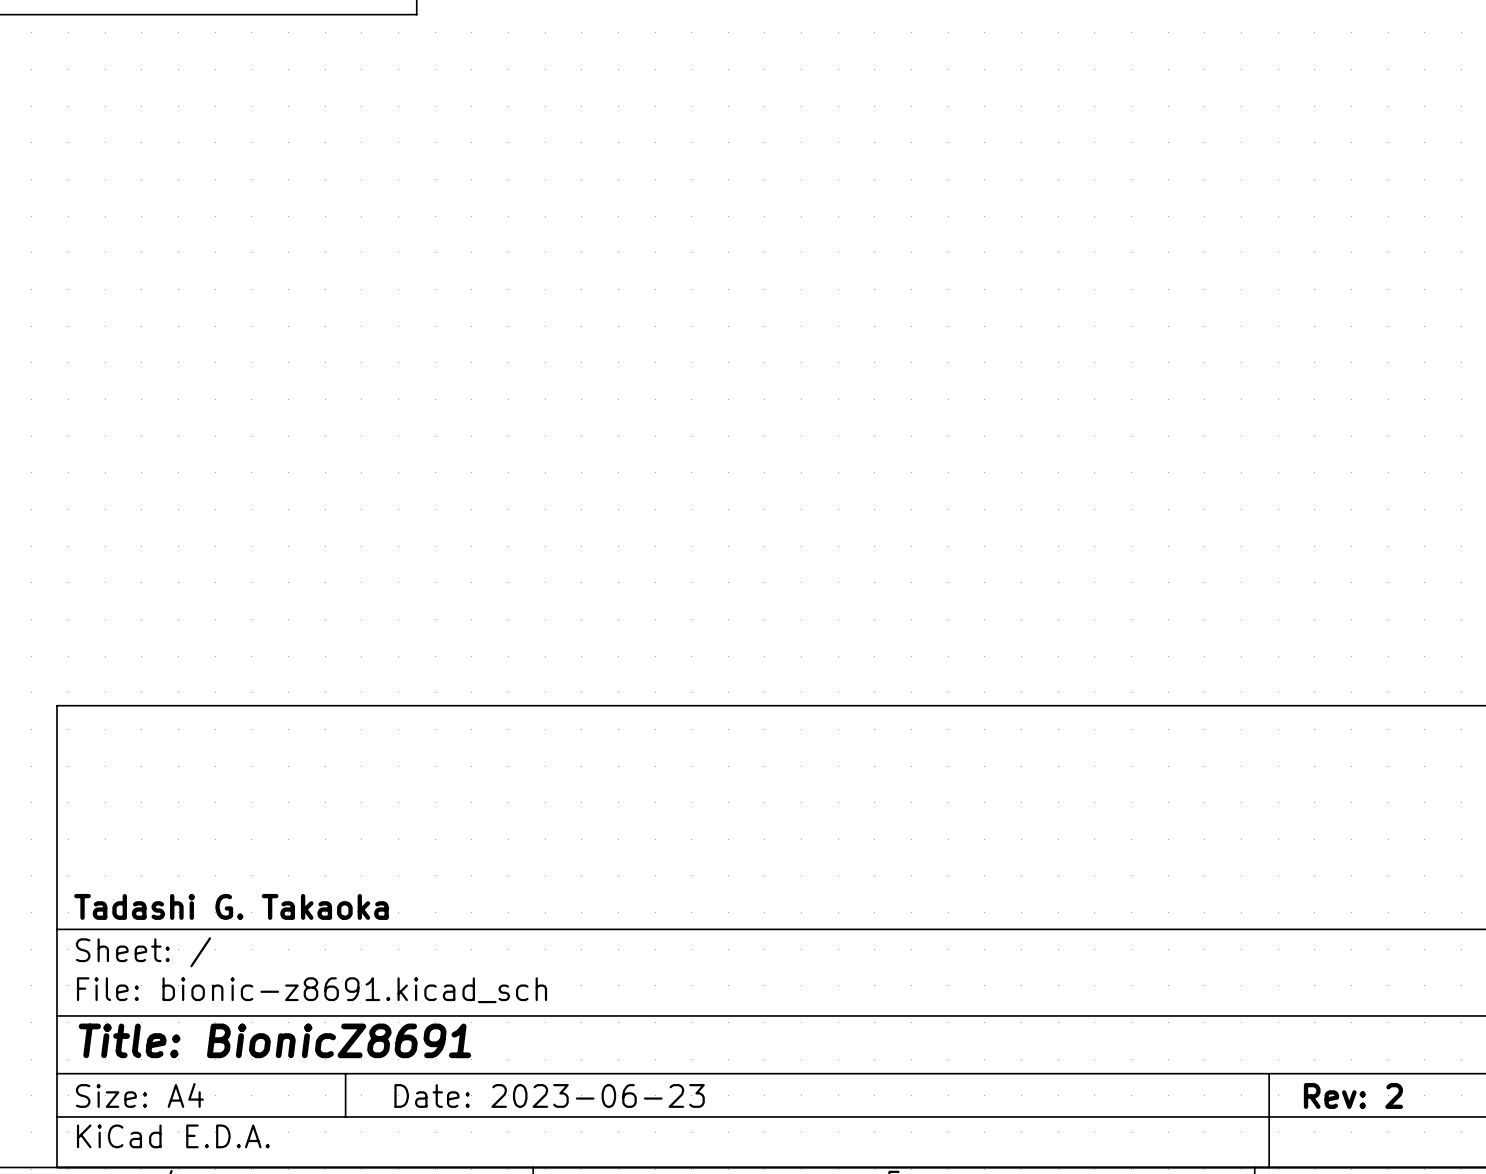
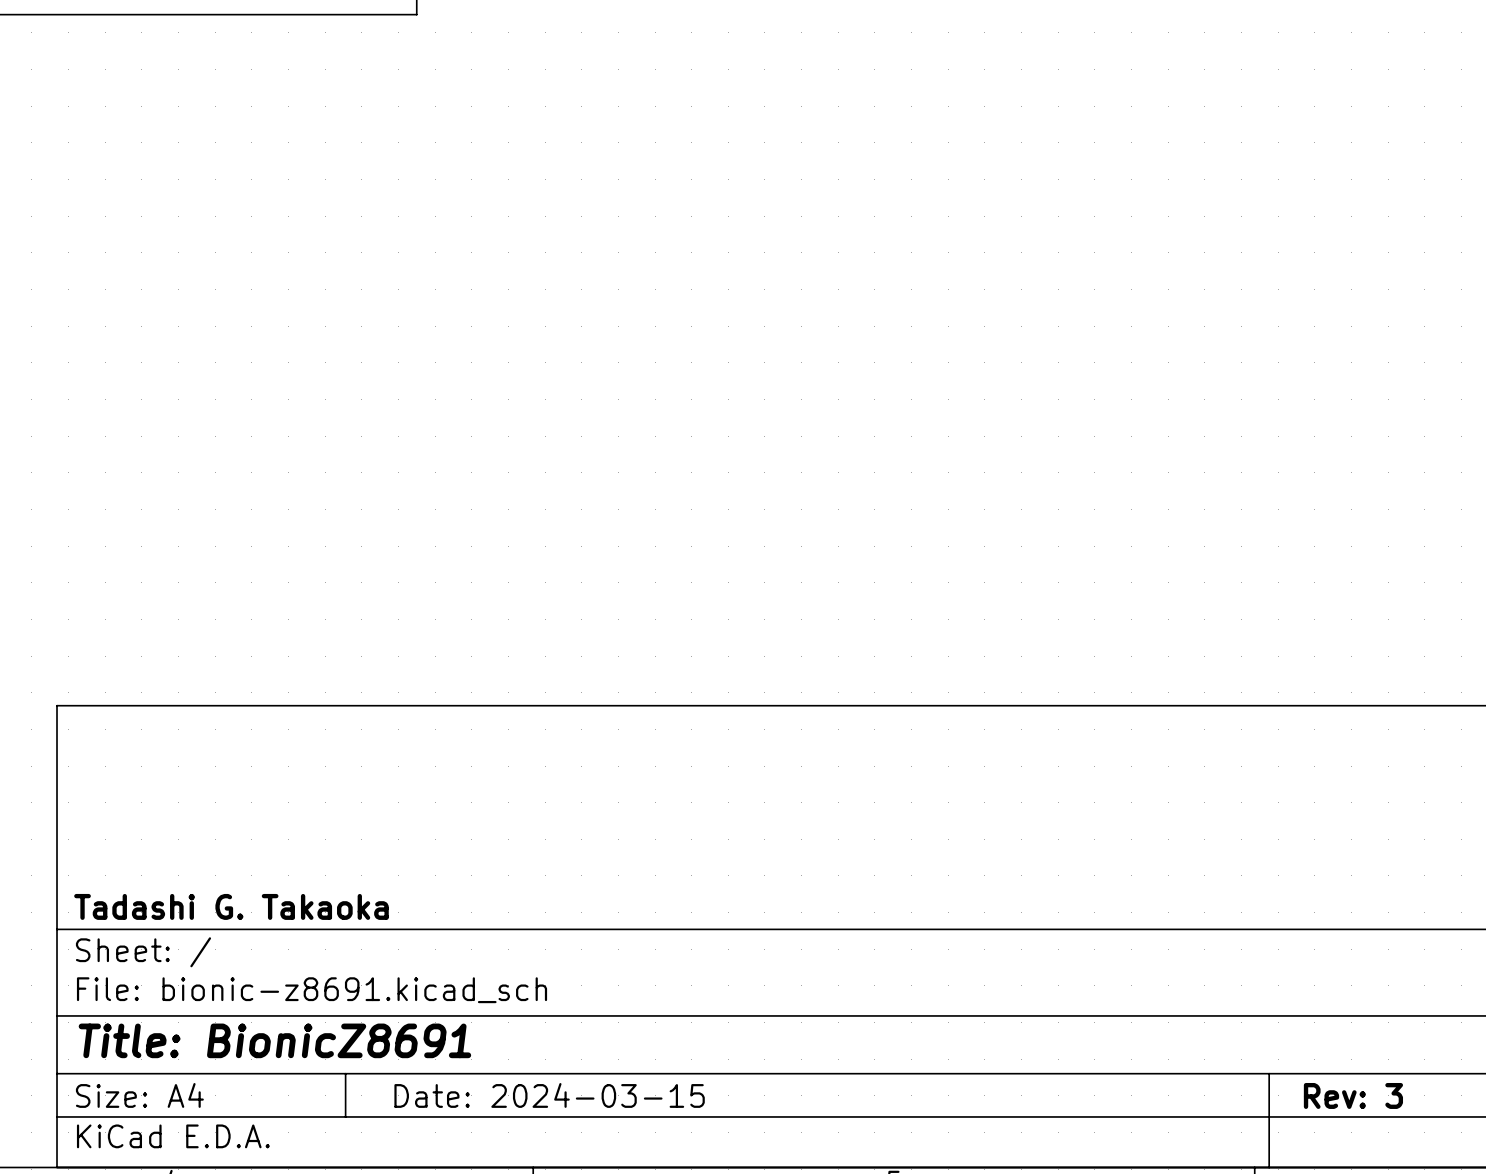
title block: Date: 2023-06-23 (549, 1095) -> Date: 2024-03-15 (549, 1095)
title block: Rev: 2 (1353, 1095) -> Rev: 3 (1353, 1095)

